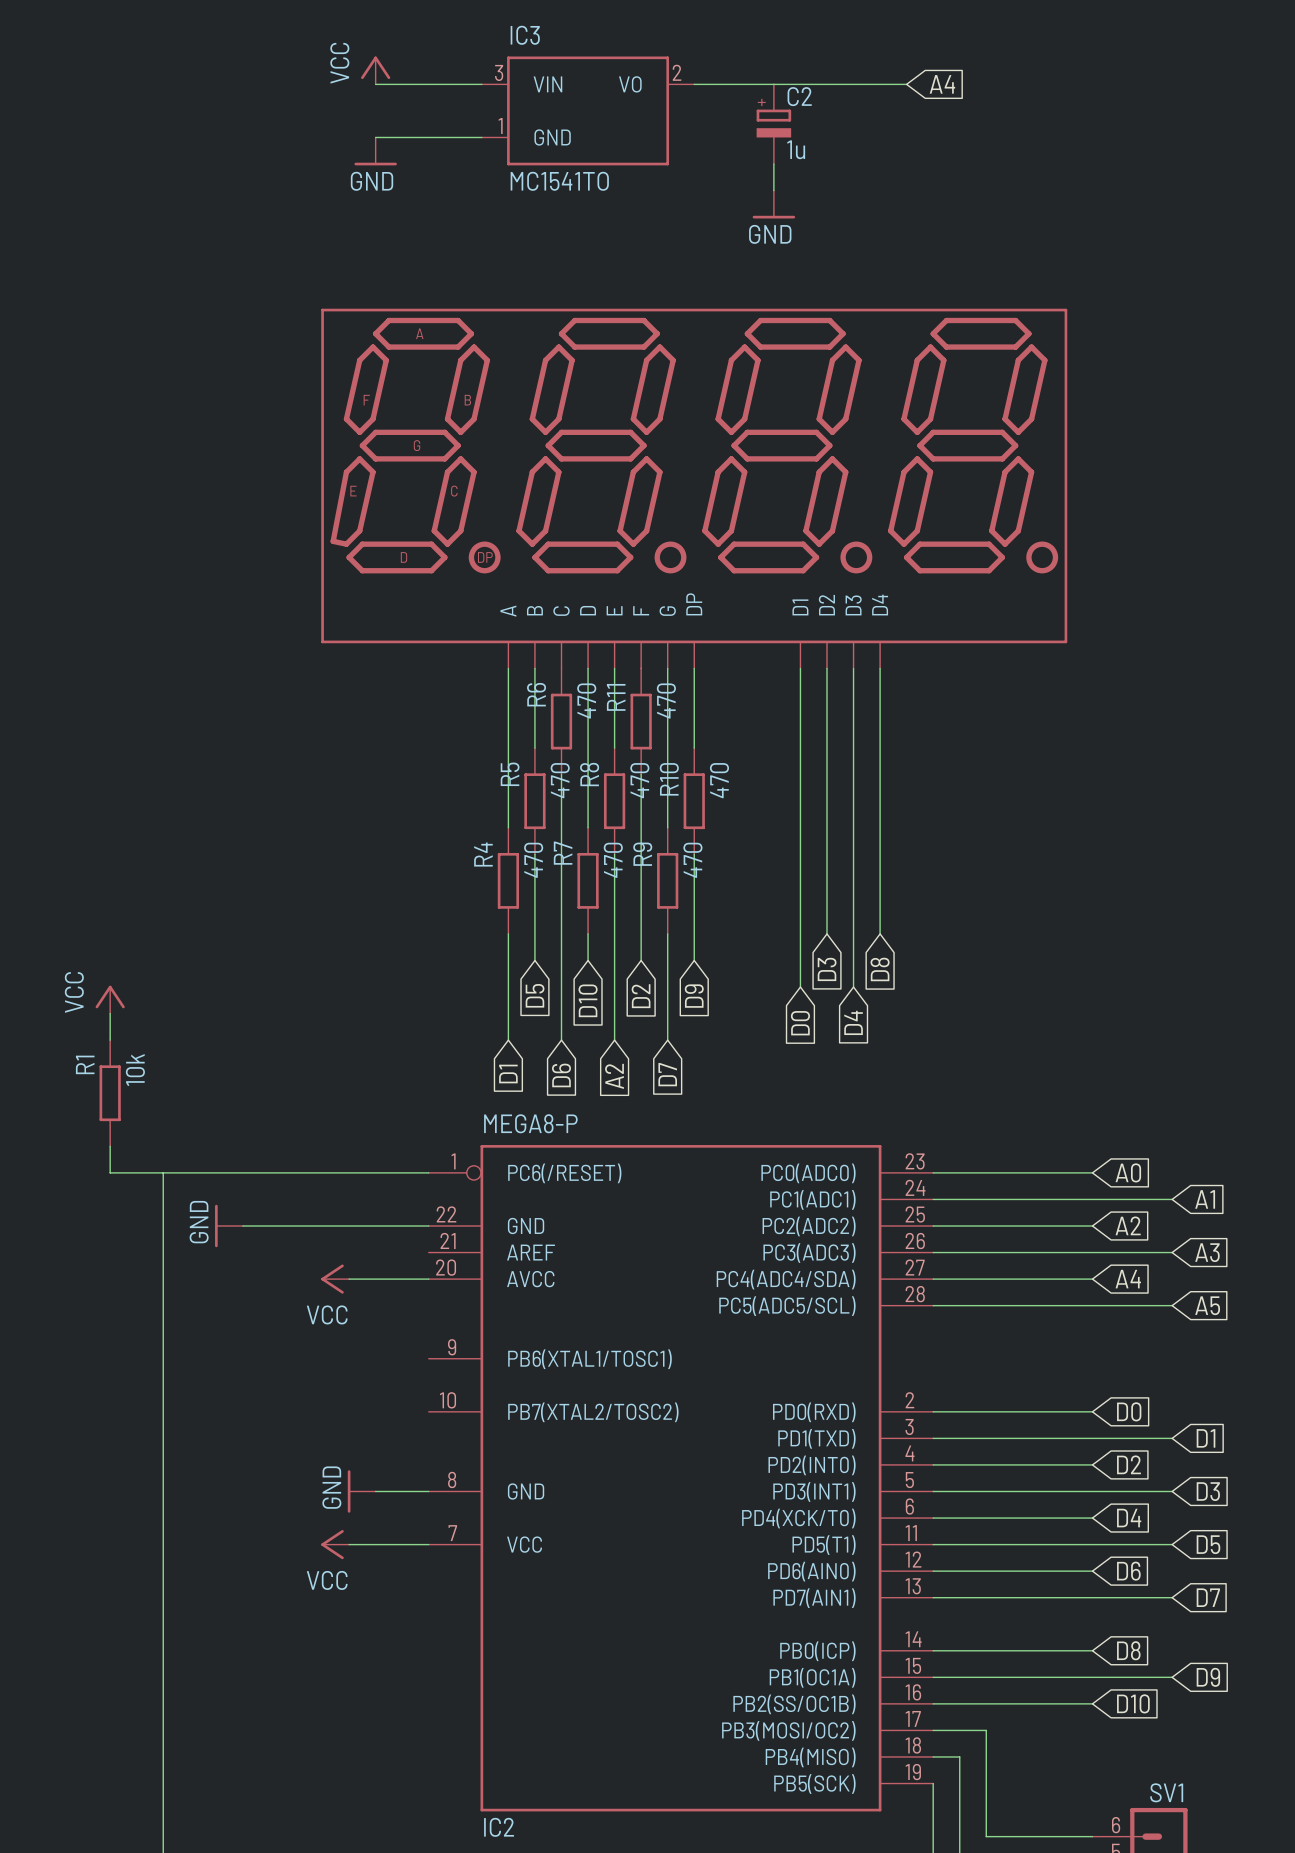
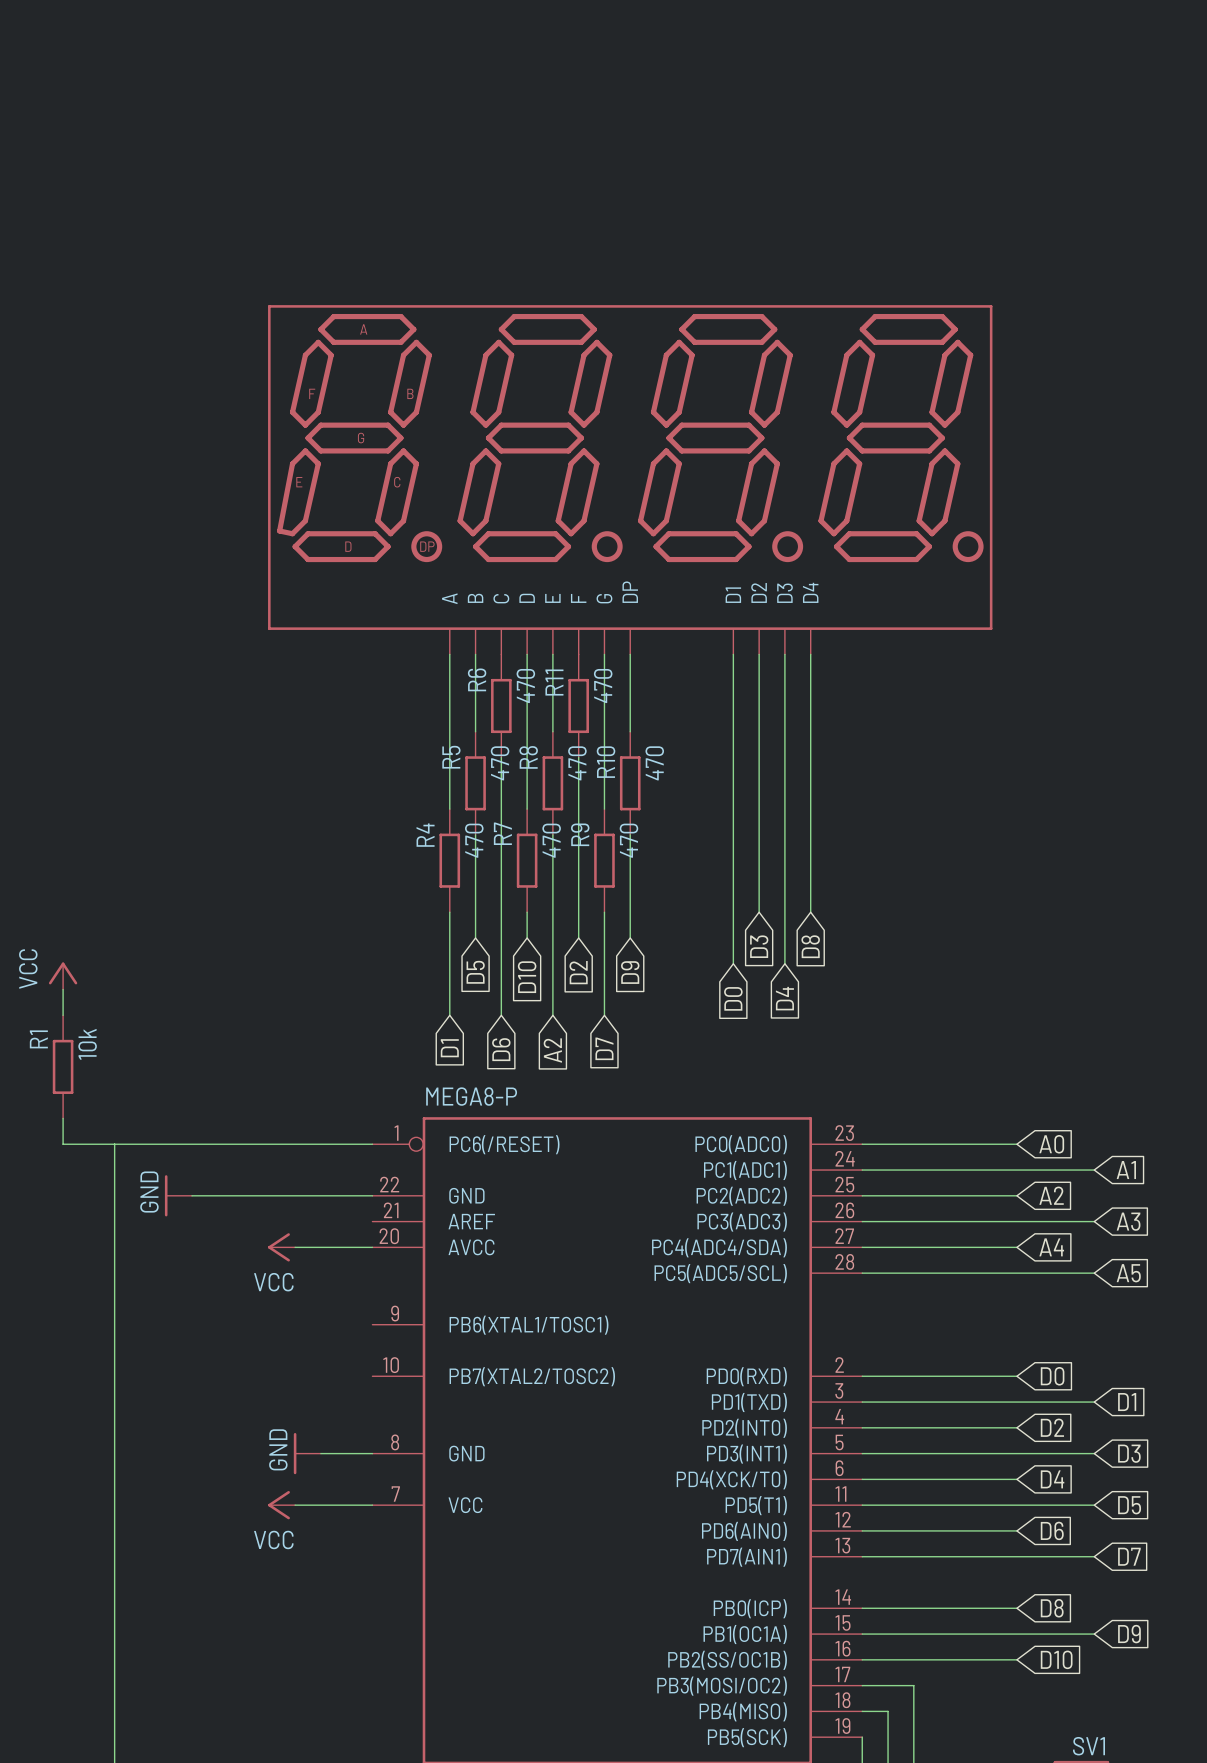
power symbol: VCC (375, 70) -> none
wire: (375, 84) (481, 84) -> none
wire: (694, 84) (906, 84) -> none
global label: A4 (942, 84) -> none
IC3: MC1541TO (588, 110) -> none
C2: 1u (773, 124) -> none
wire: (375, 137) (481, 137) -> none
power symbol: GND (375, 151) -> none
wire: (773, 164) (773, 190) -> none
power symbol: GND (773, 204) -> none

